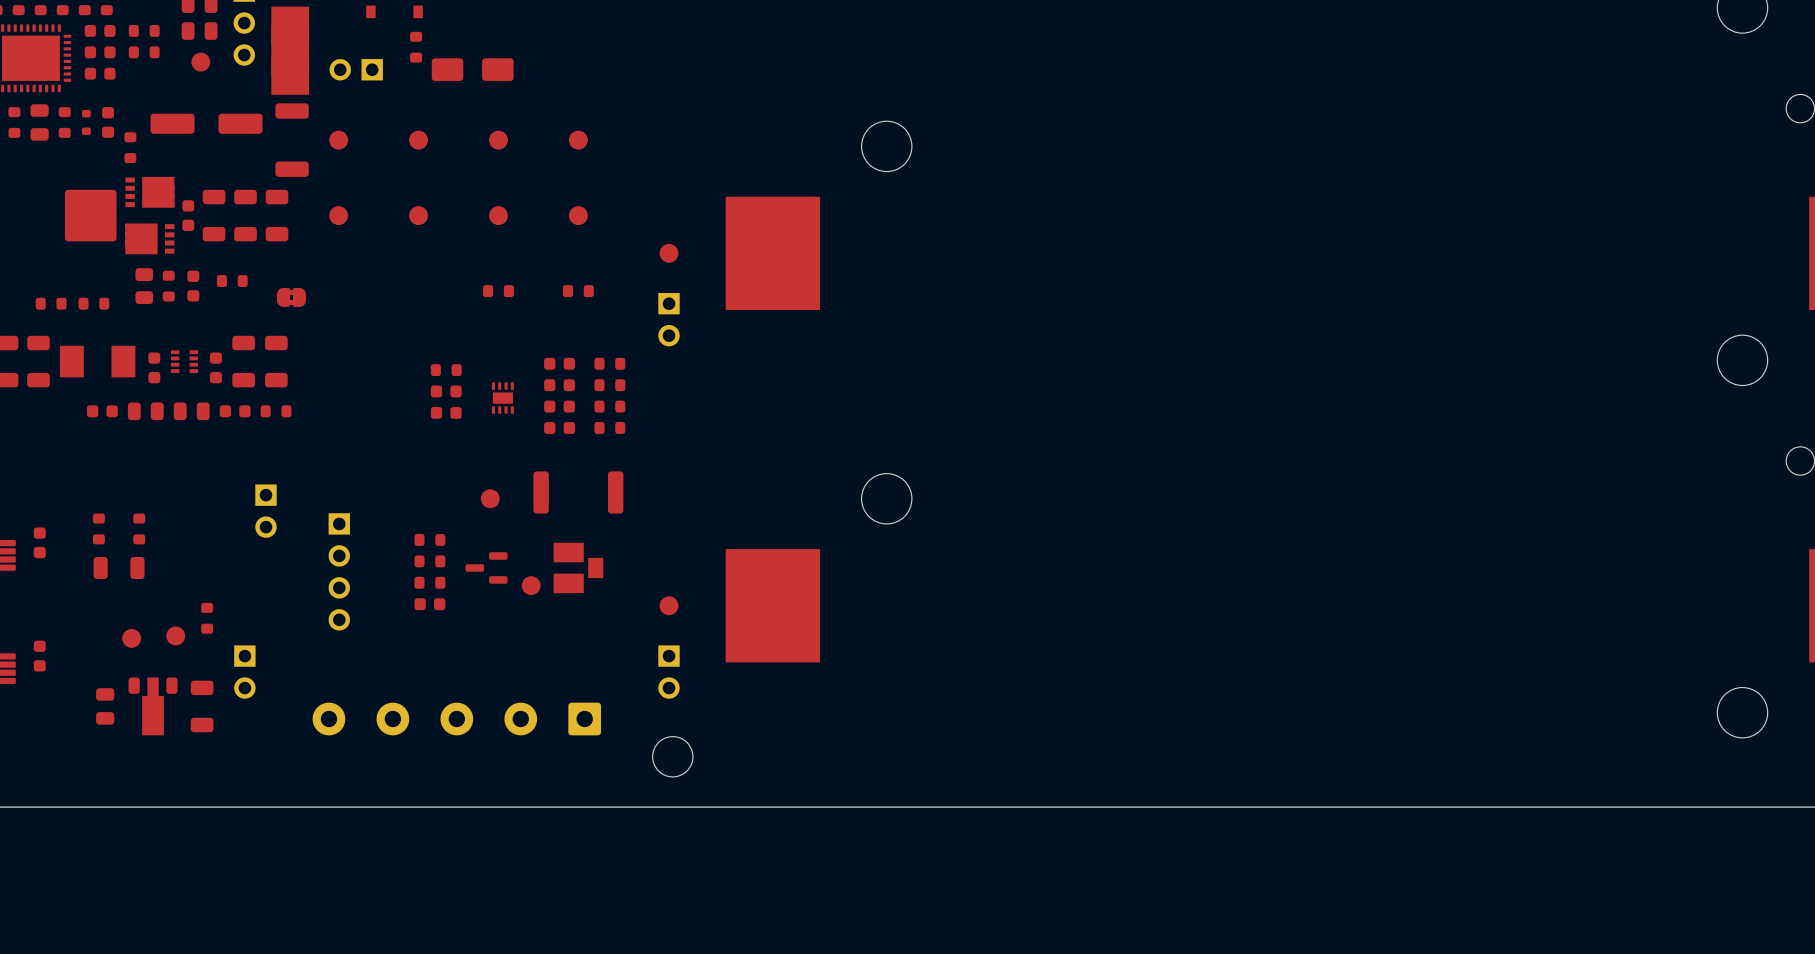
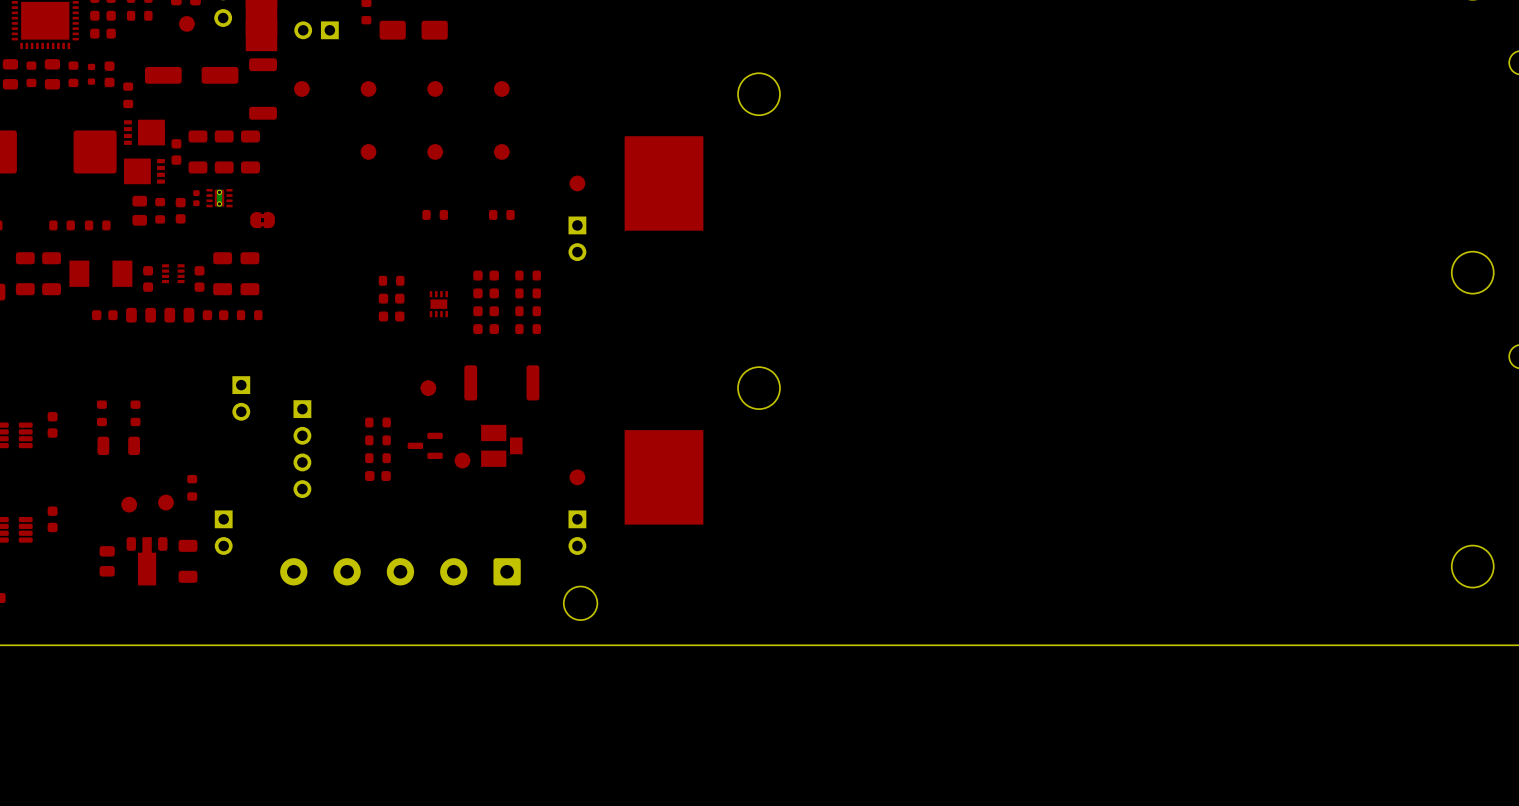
part: (338, 215) -> none
part: none -> (196, 198)
part: none -> (219, 198)
part: (232, 281) -> none

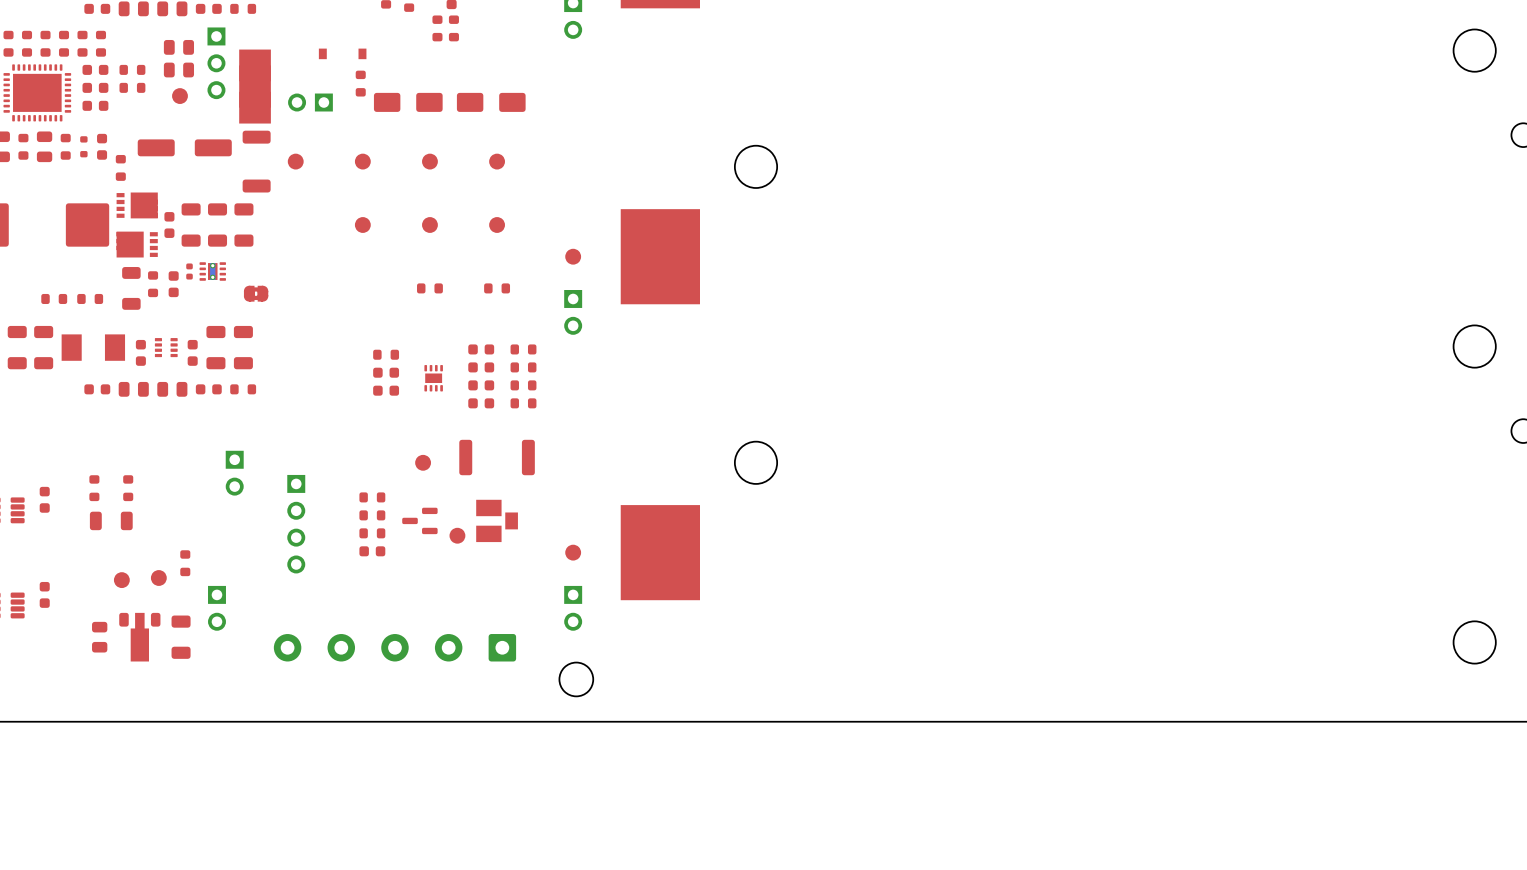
part: none -> (491, 102)
part footprint: [132, 195, 148, 226] -> [122, 267, 141, 310]

